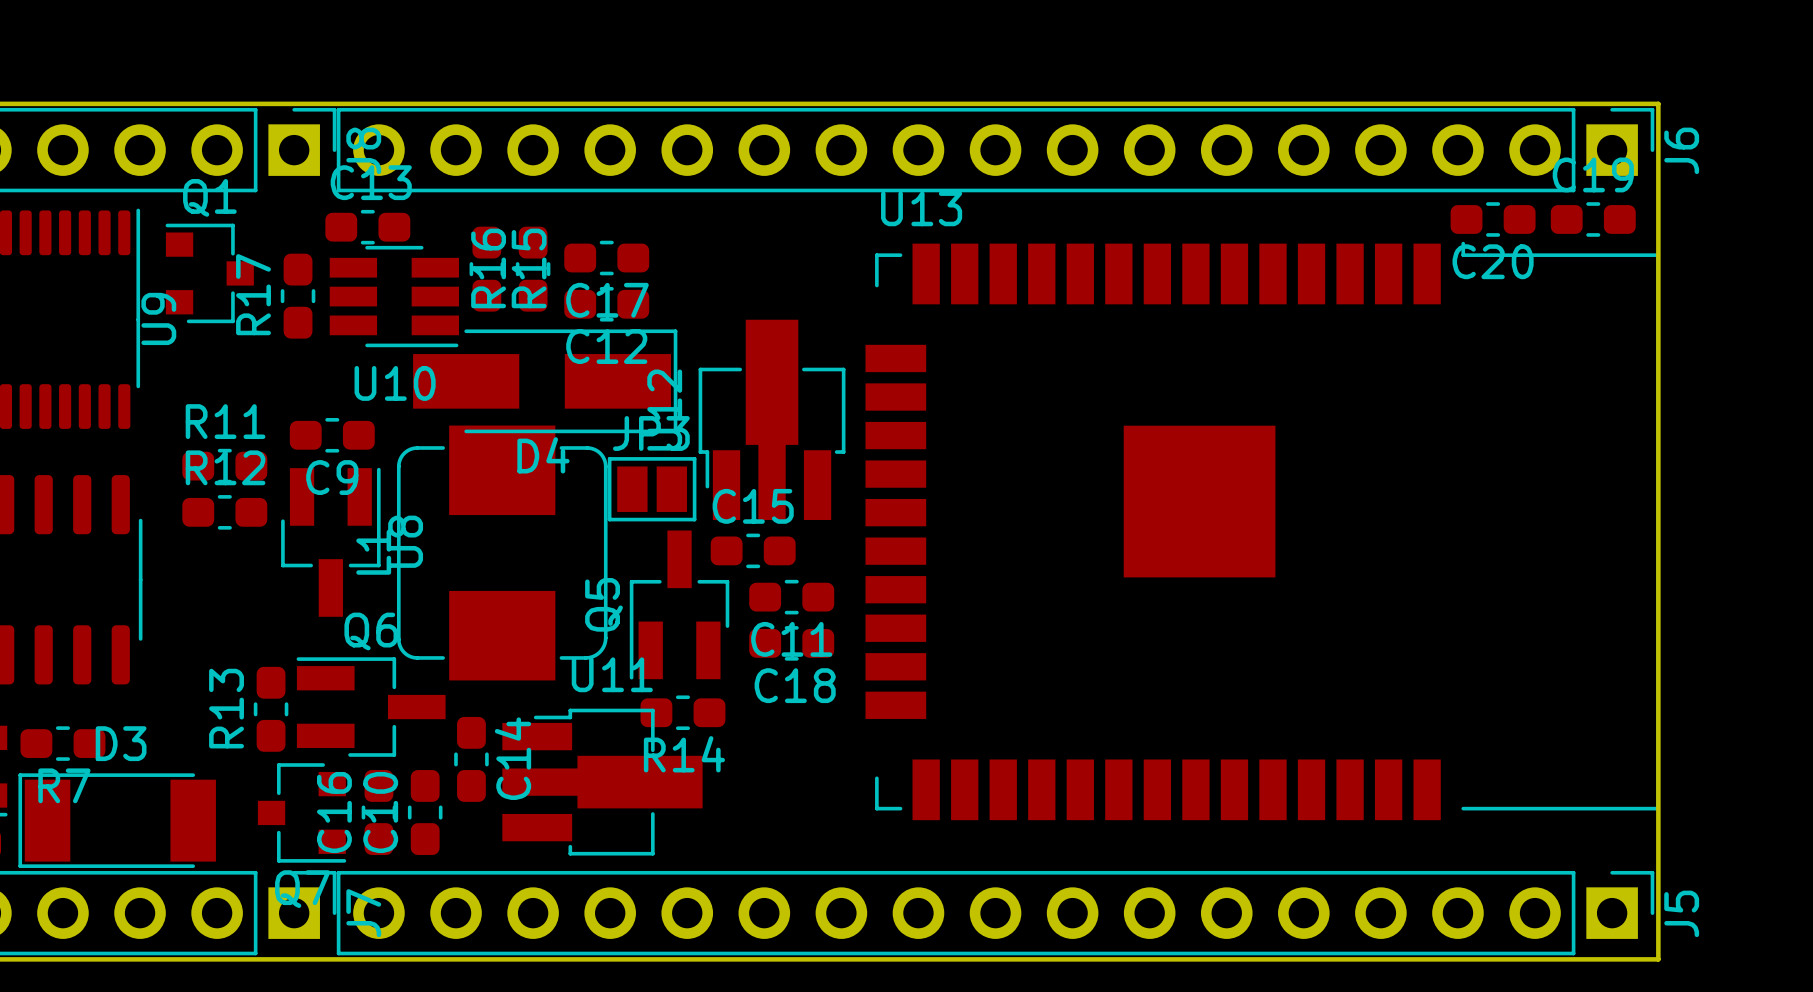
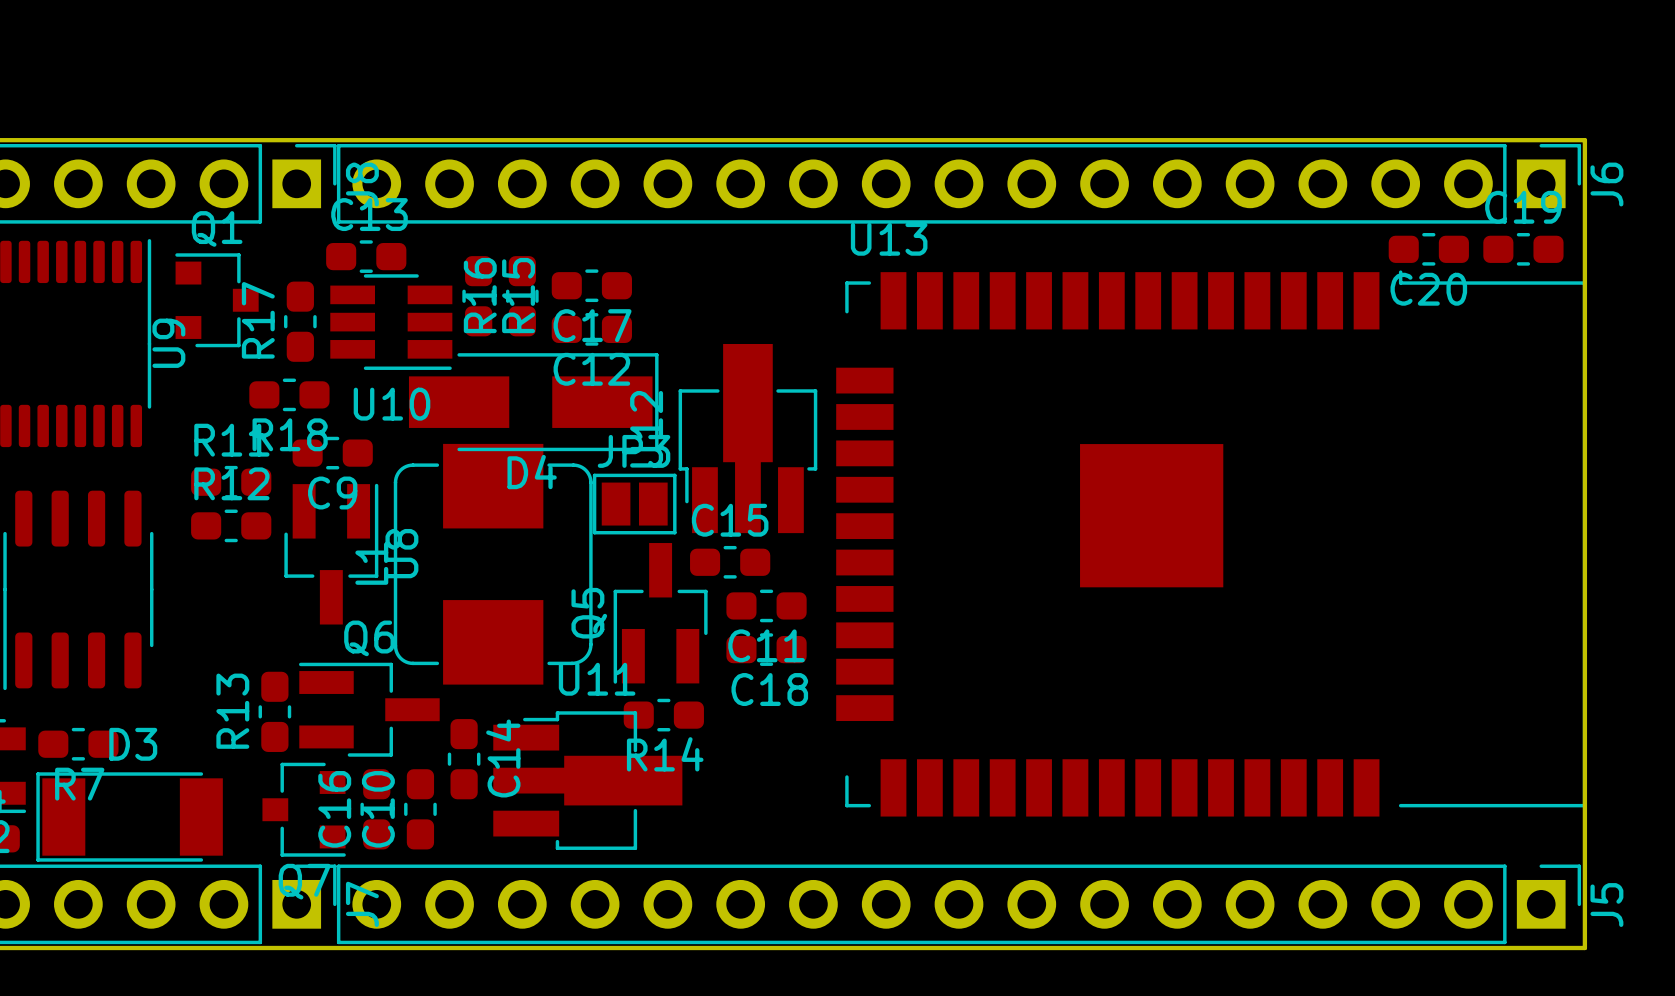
R18: none -> (289, 394)

